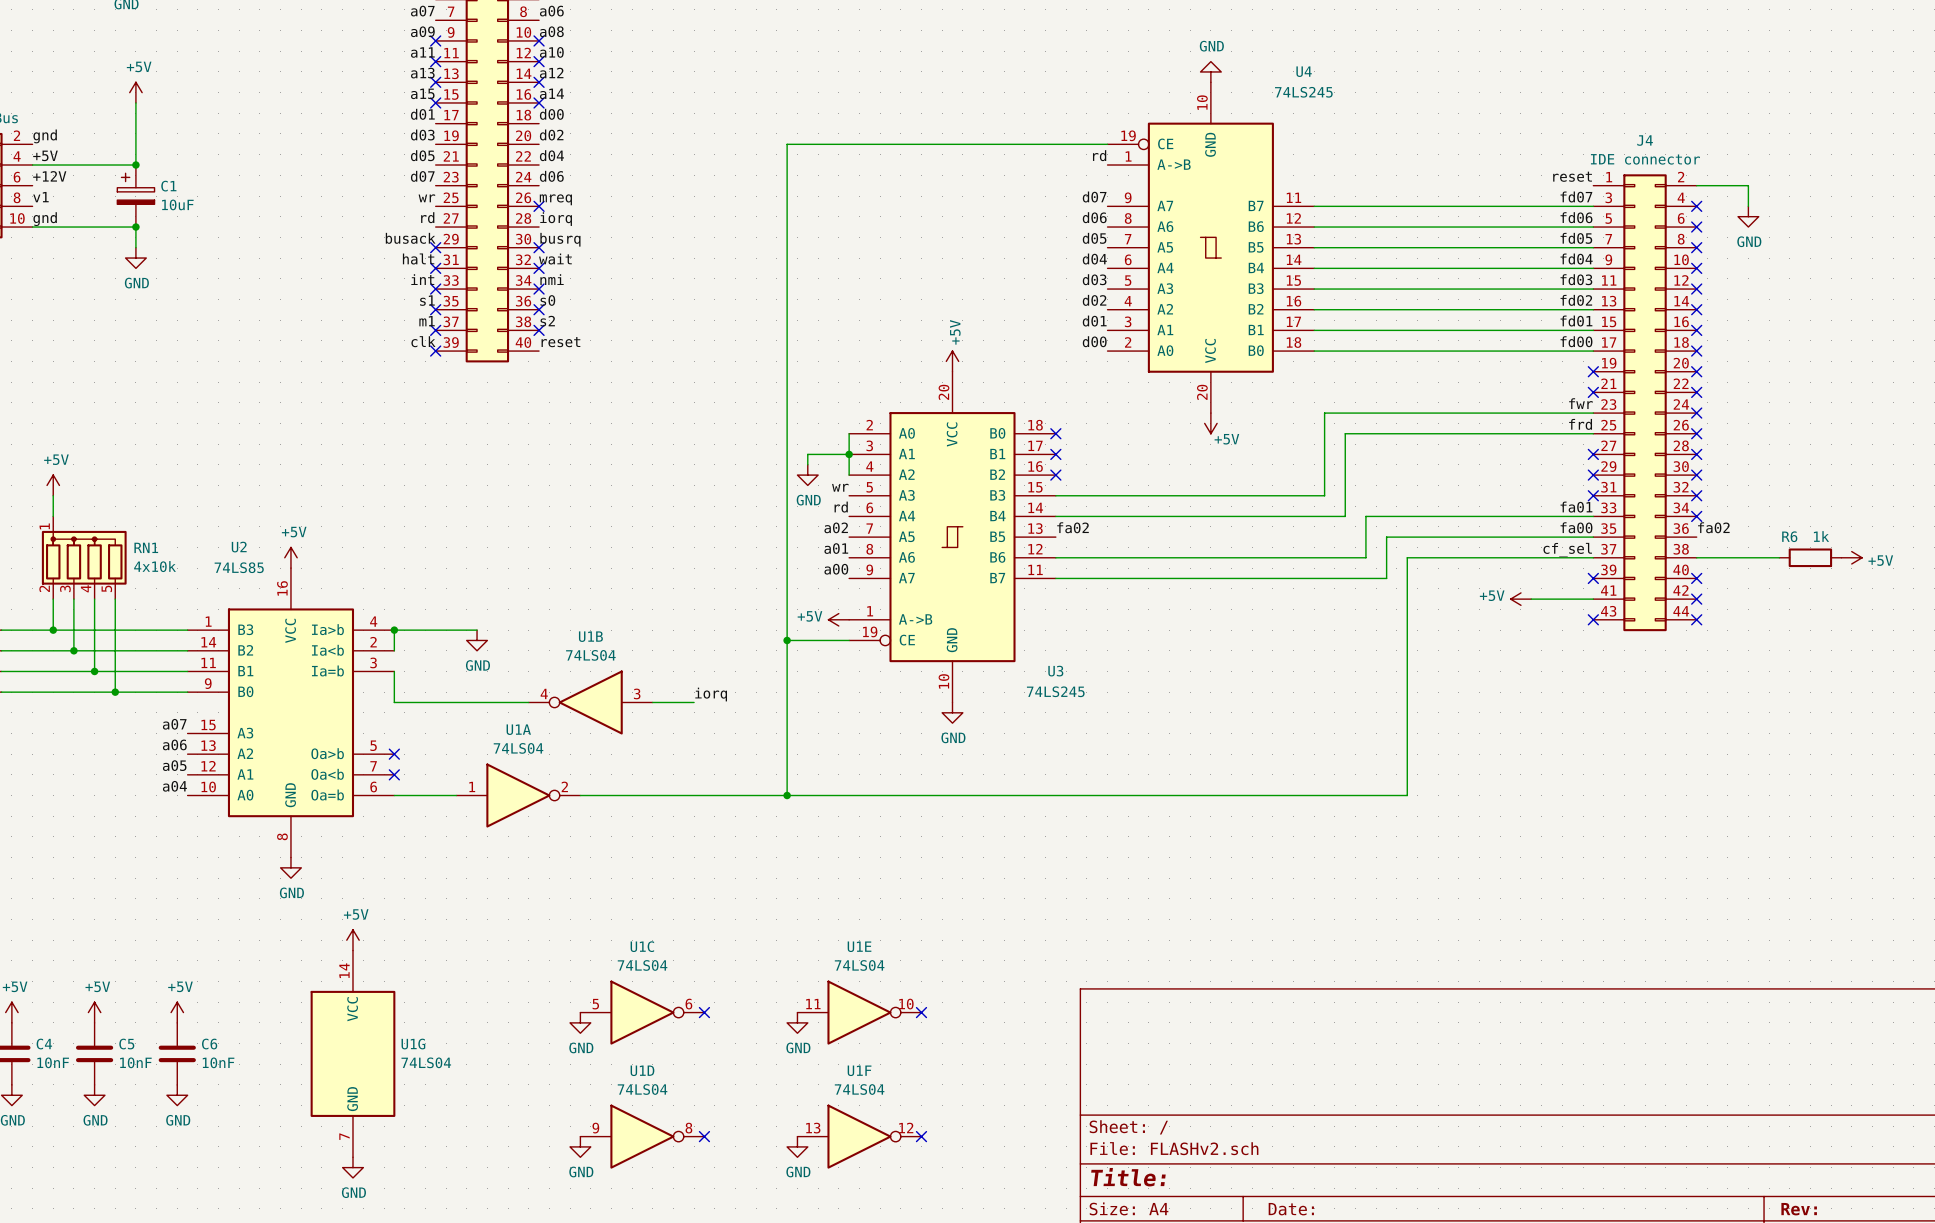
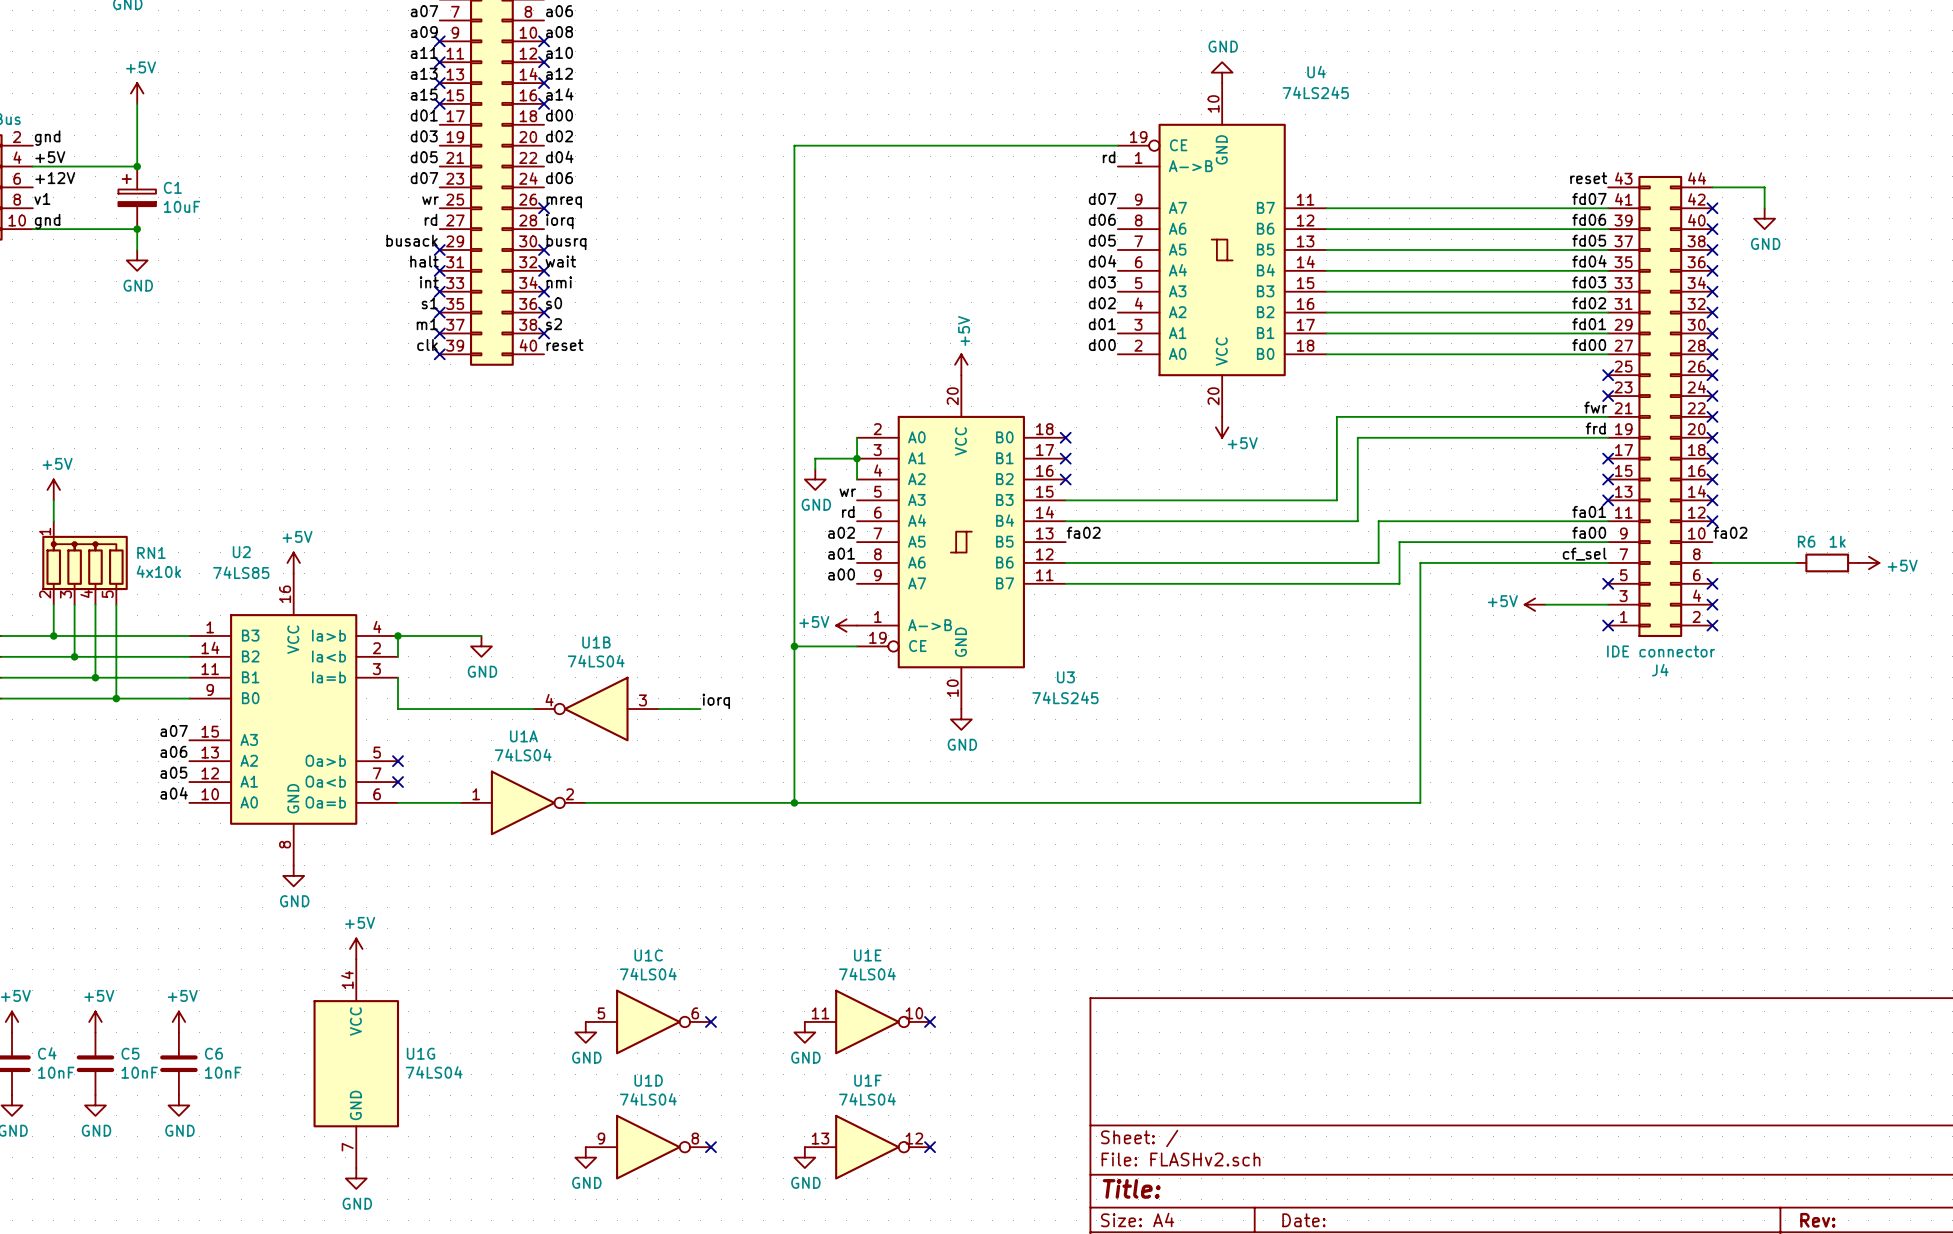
J4 flip: as is (1645, 402) -> up-down (1660, 406)

